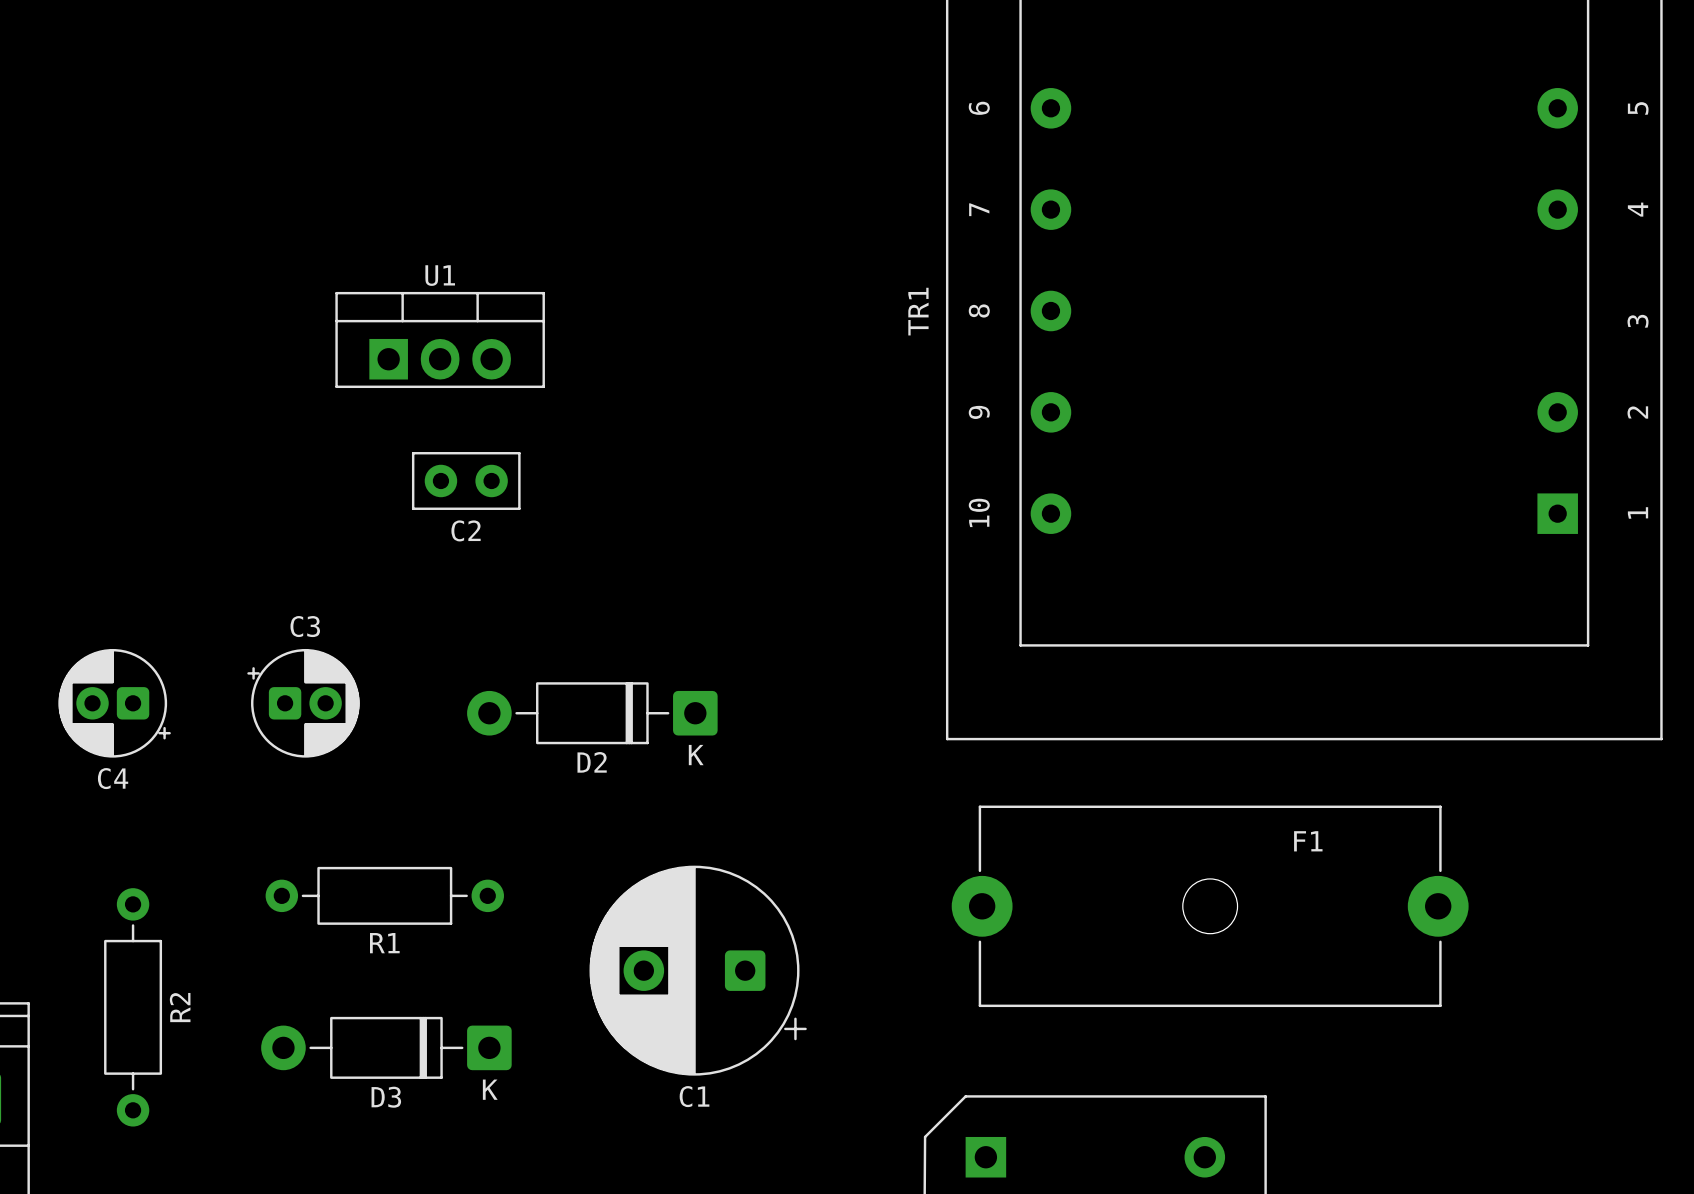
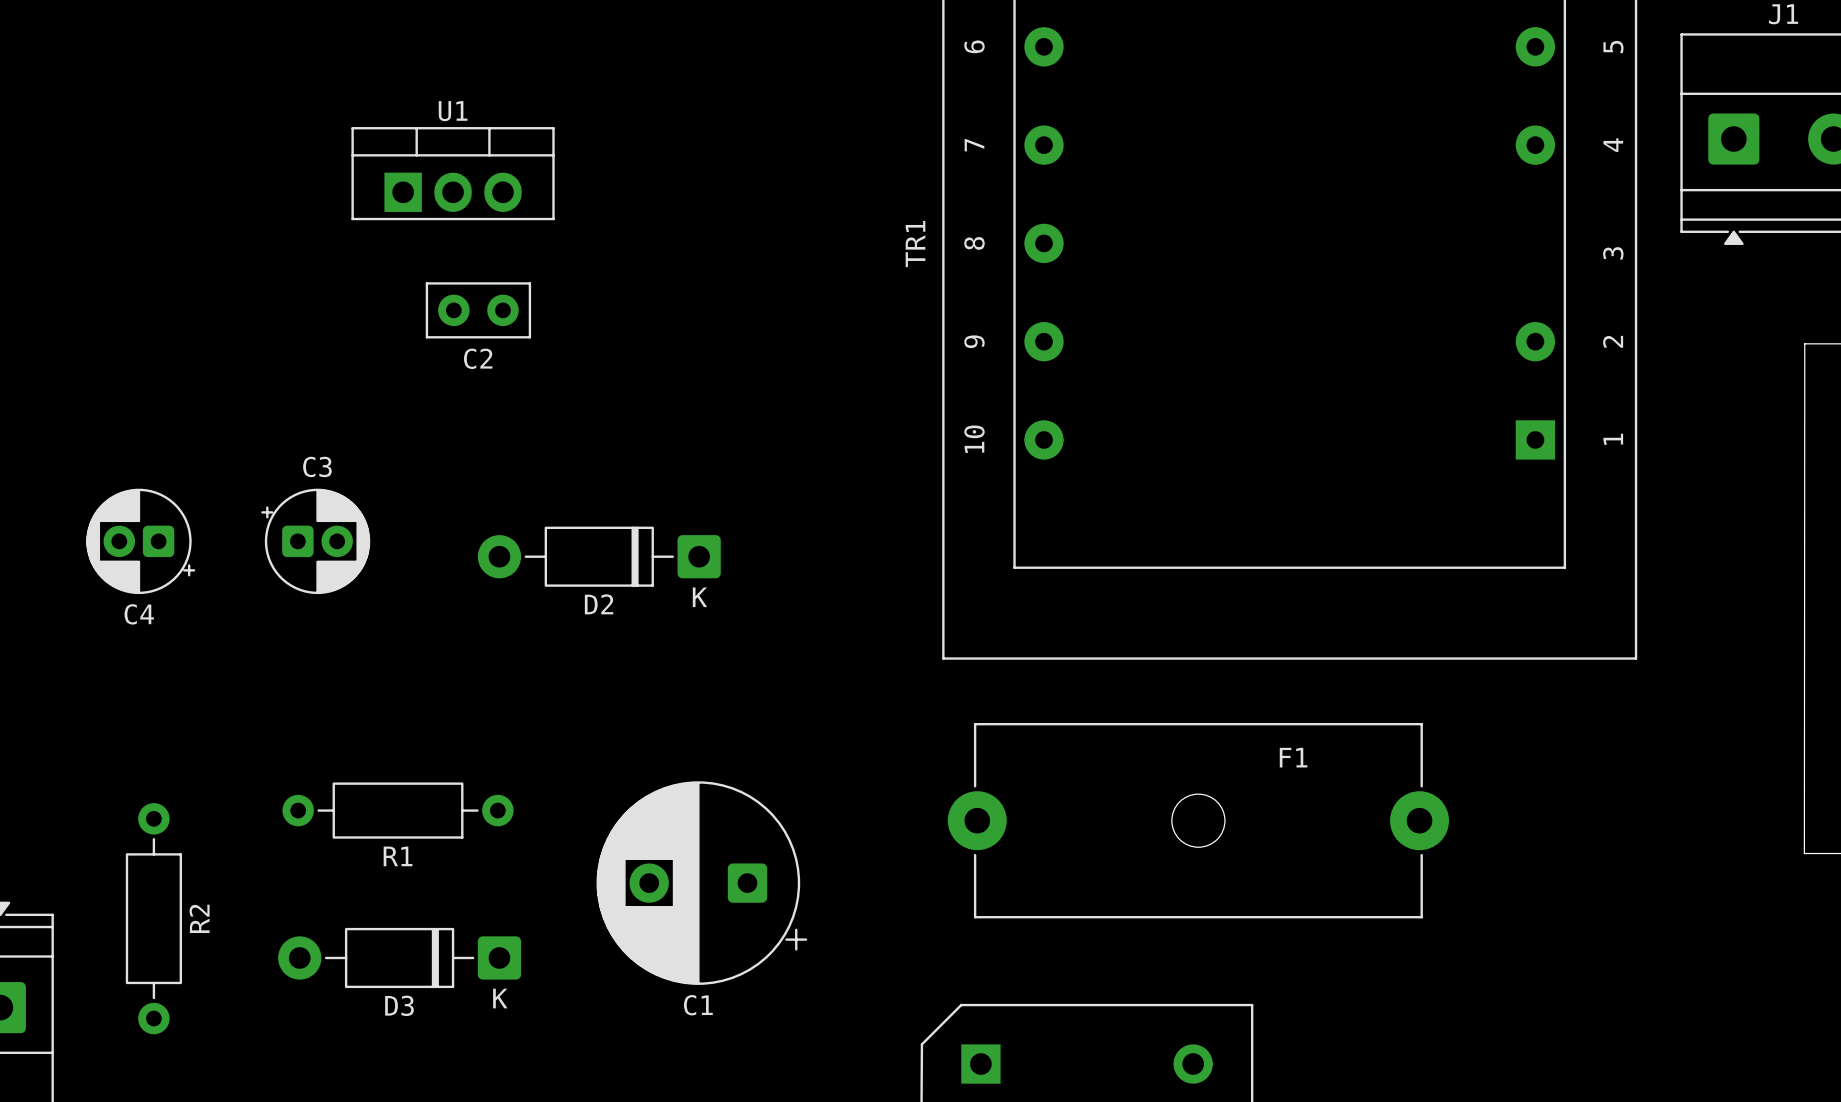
U1 position: (440, 339) -> (453, 173)
C2 position: (466, 480) -> (478, 310)
C4 position: (114, 703) -> (140, 541)
C3 position: (303, 703) -> (315, 541)
D2 position: (592, 713) -> (599, 556)

